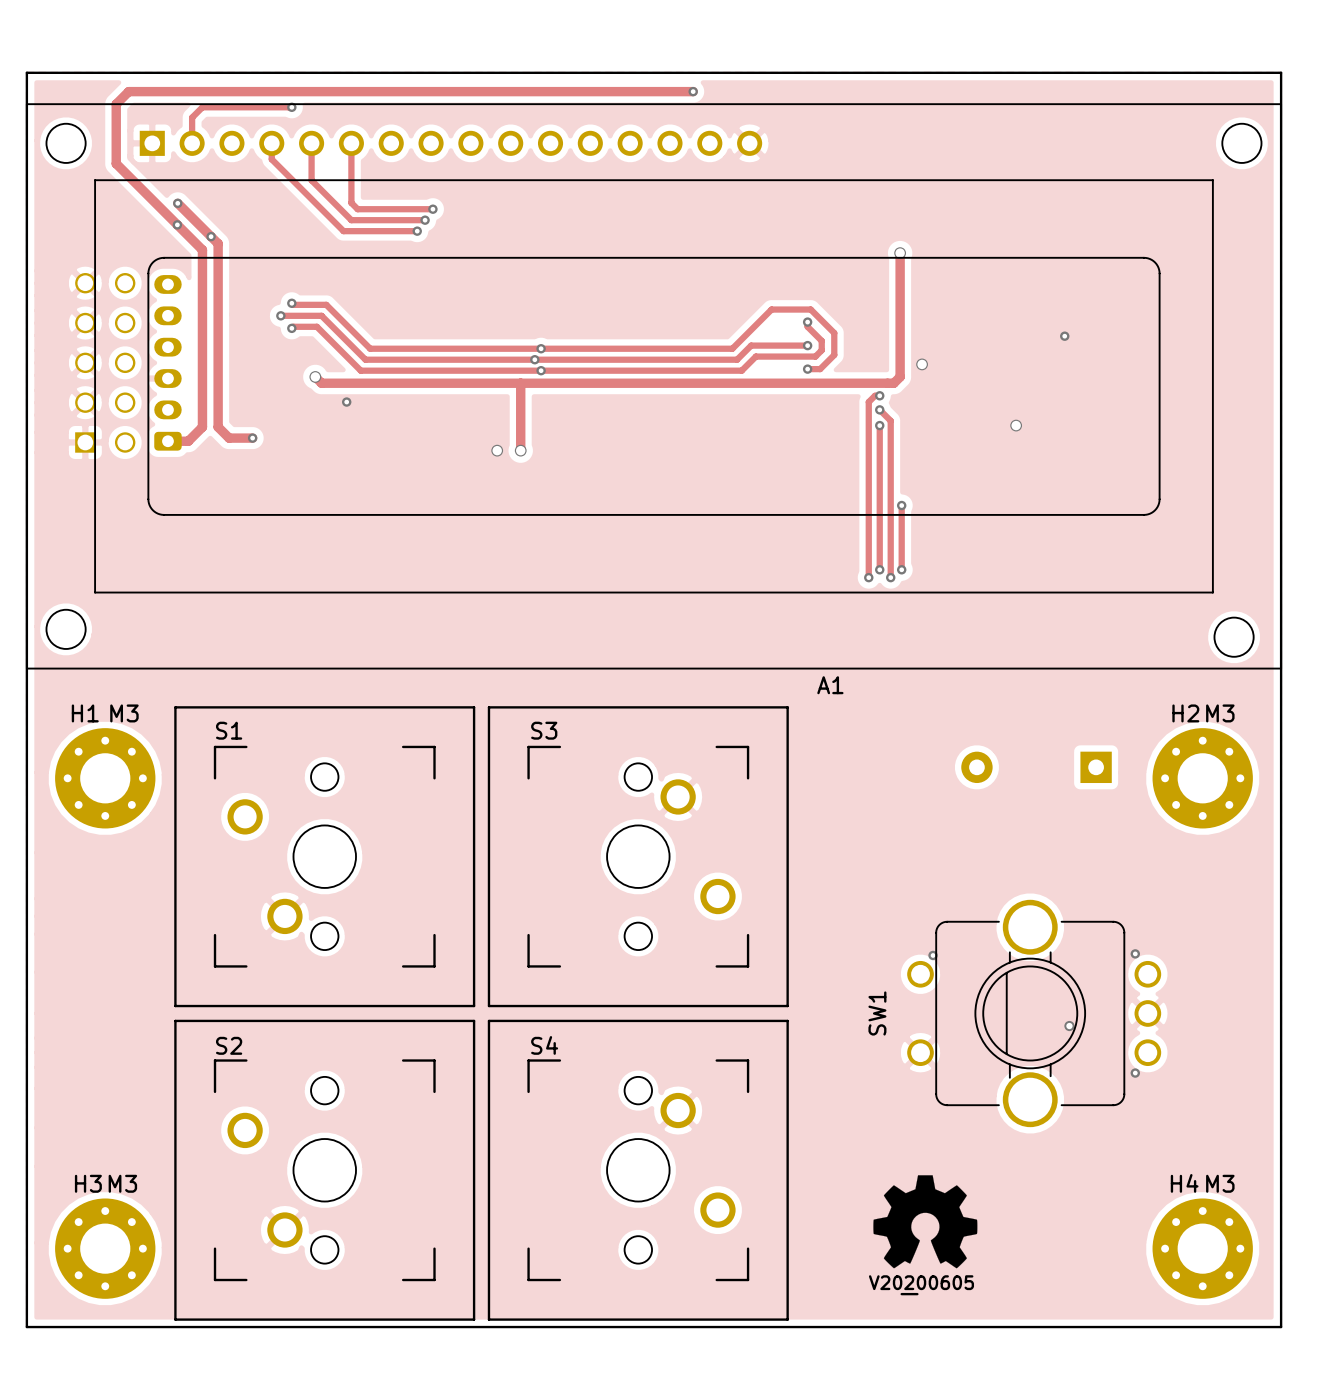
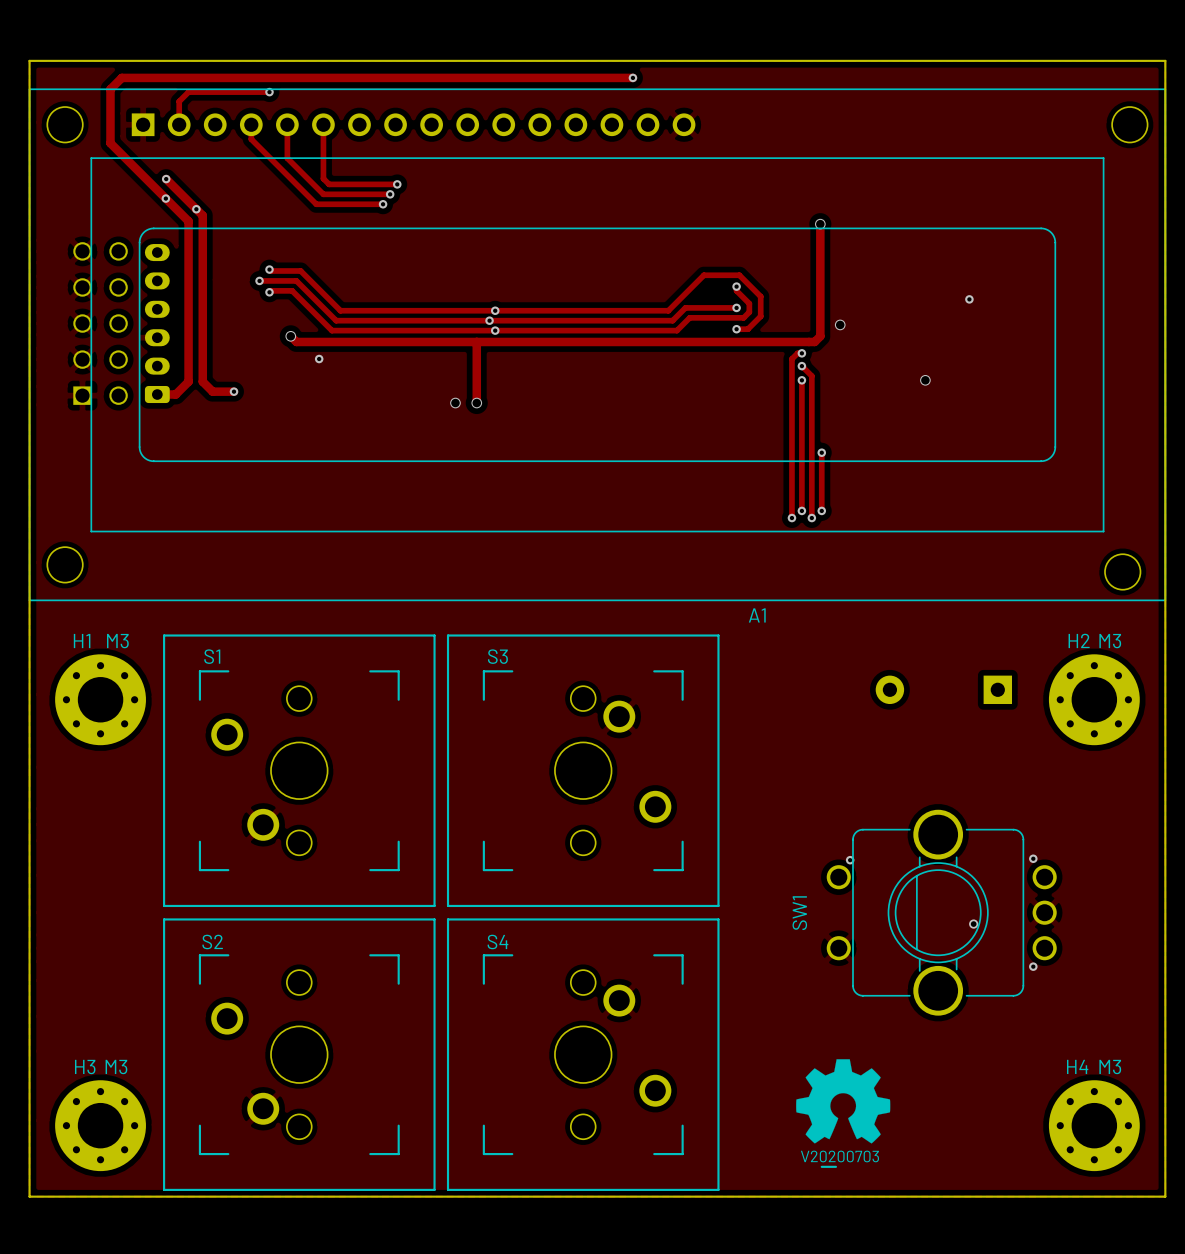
drawing shape: [868, 1275, 975, 1296] -> [800, 1150, 879, 1168]

